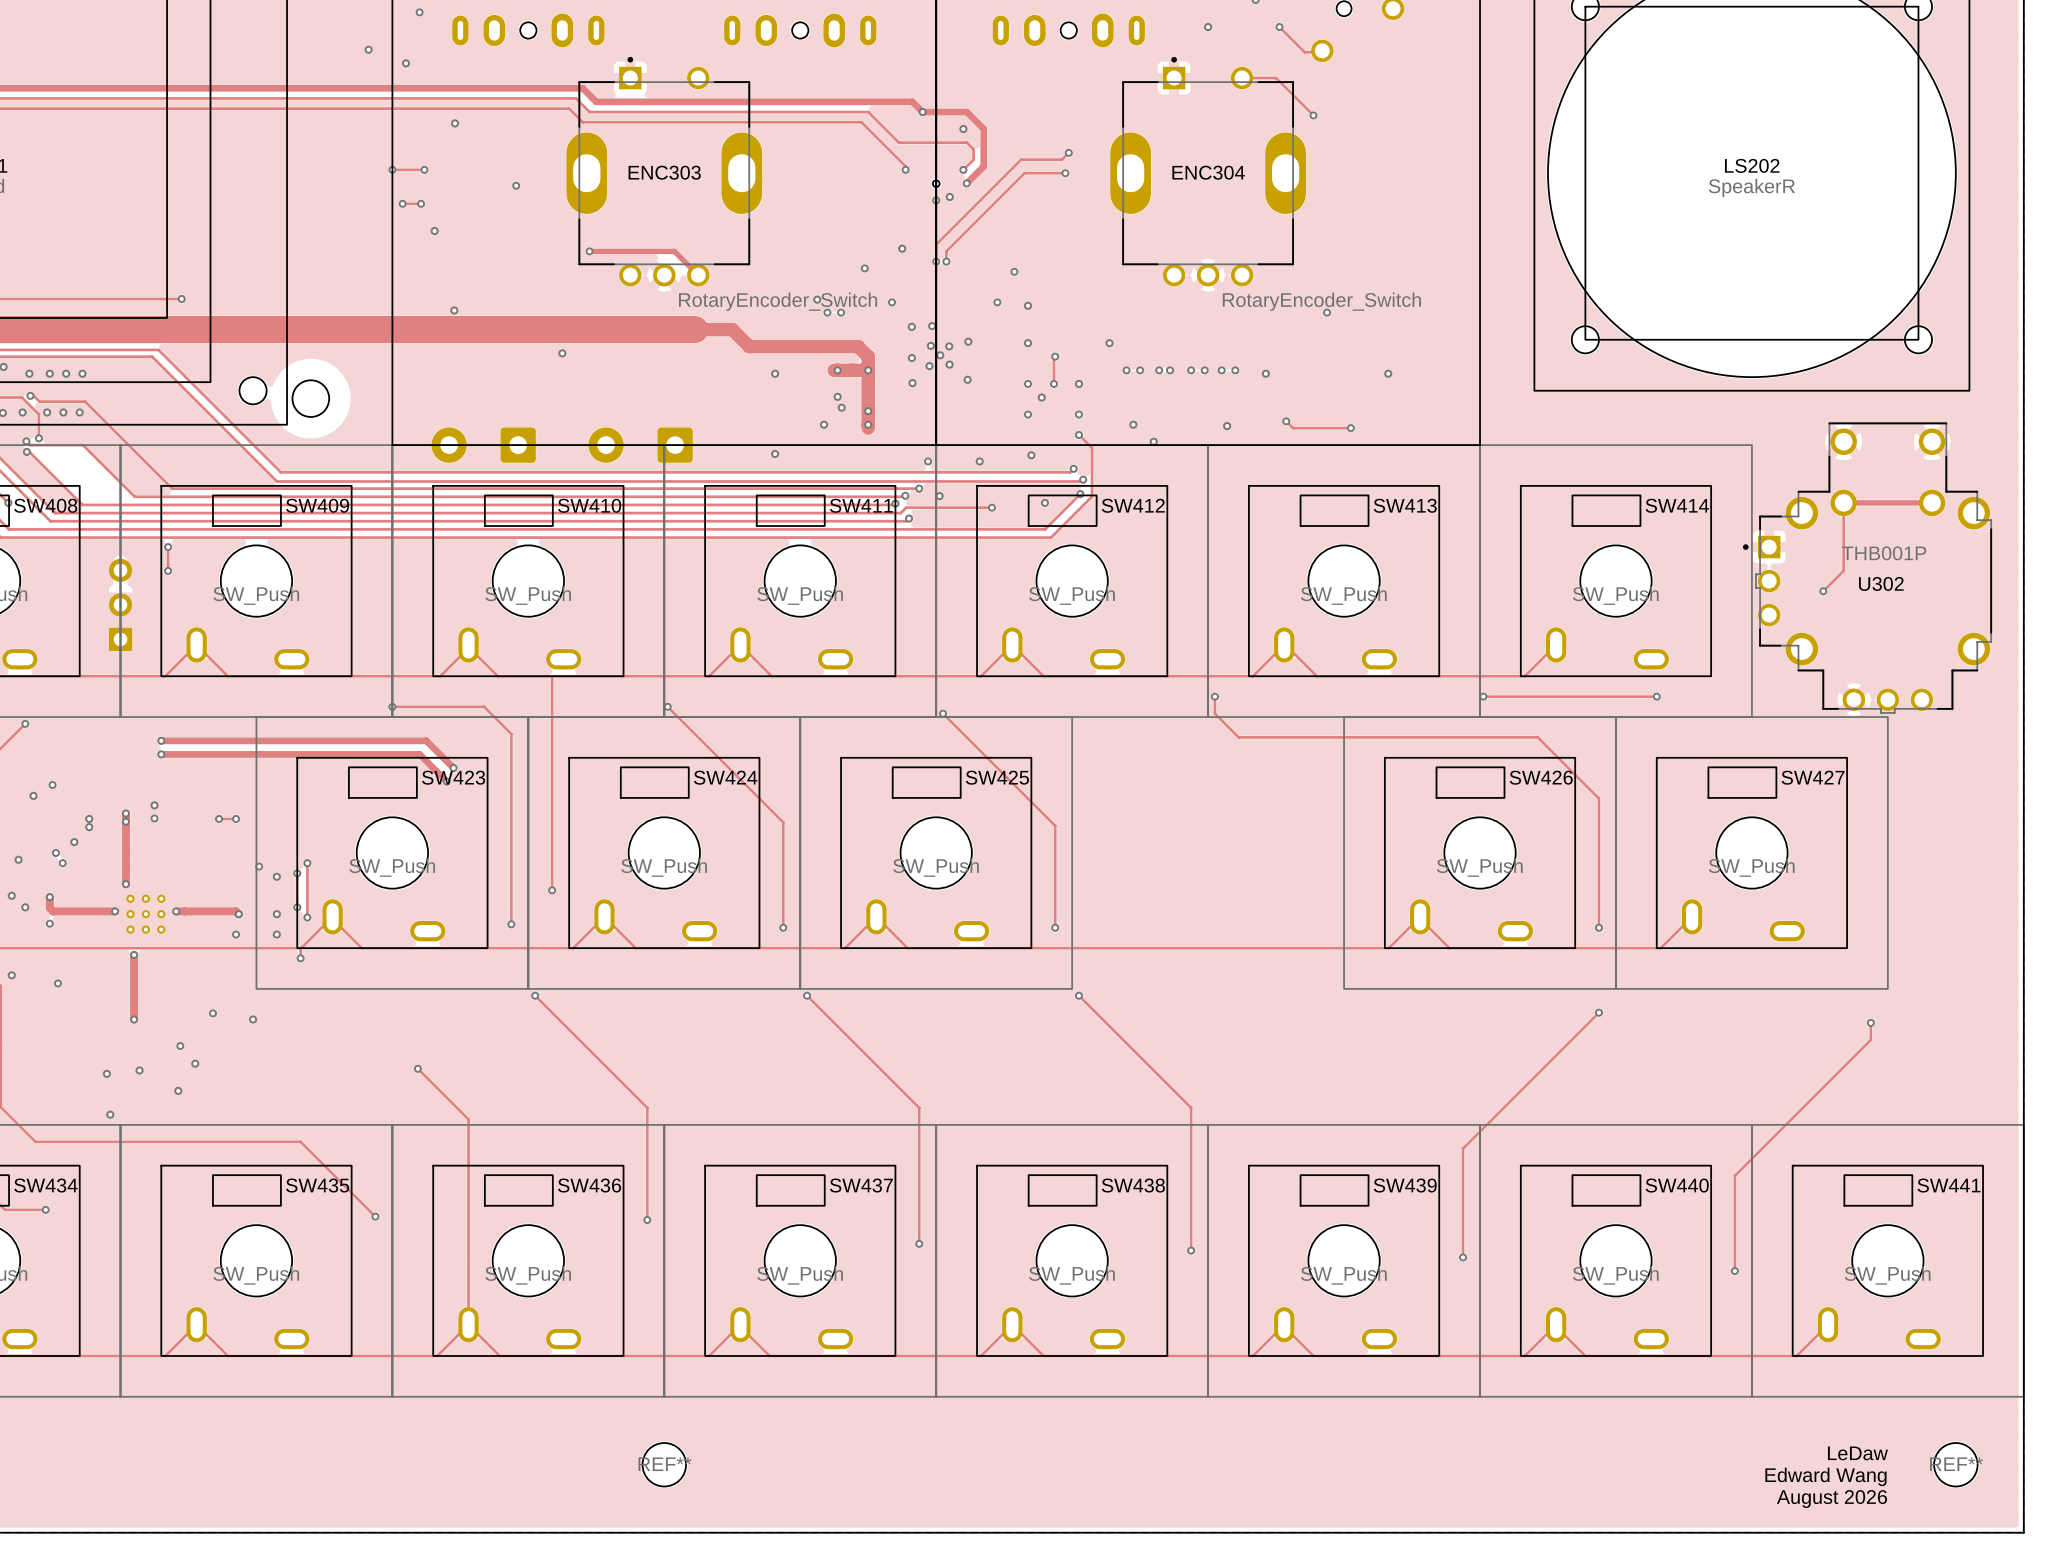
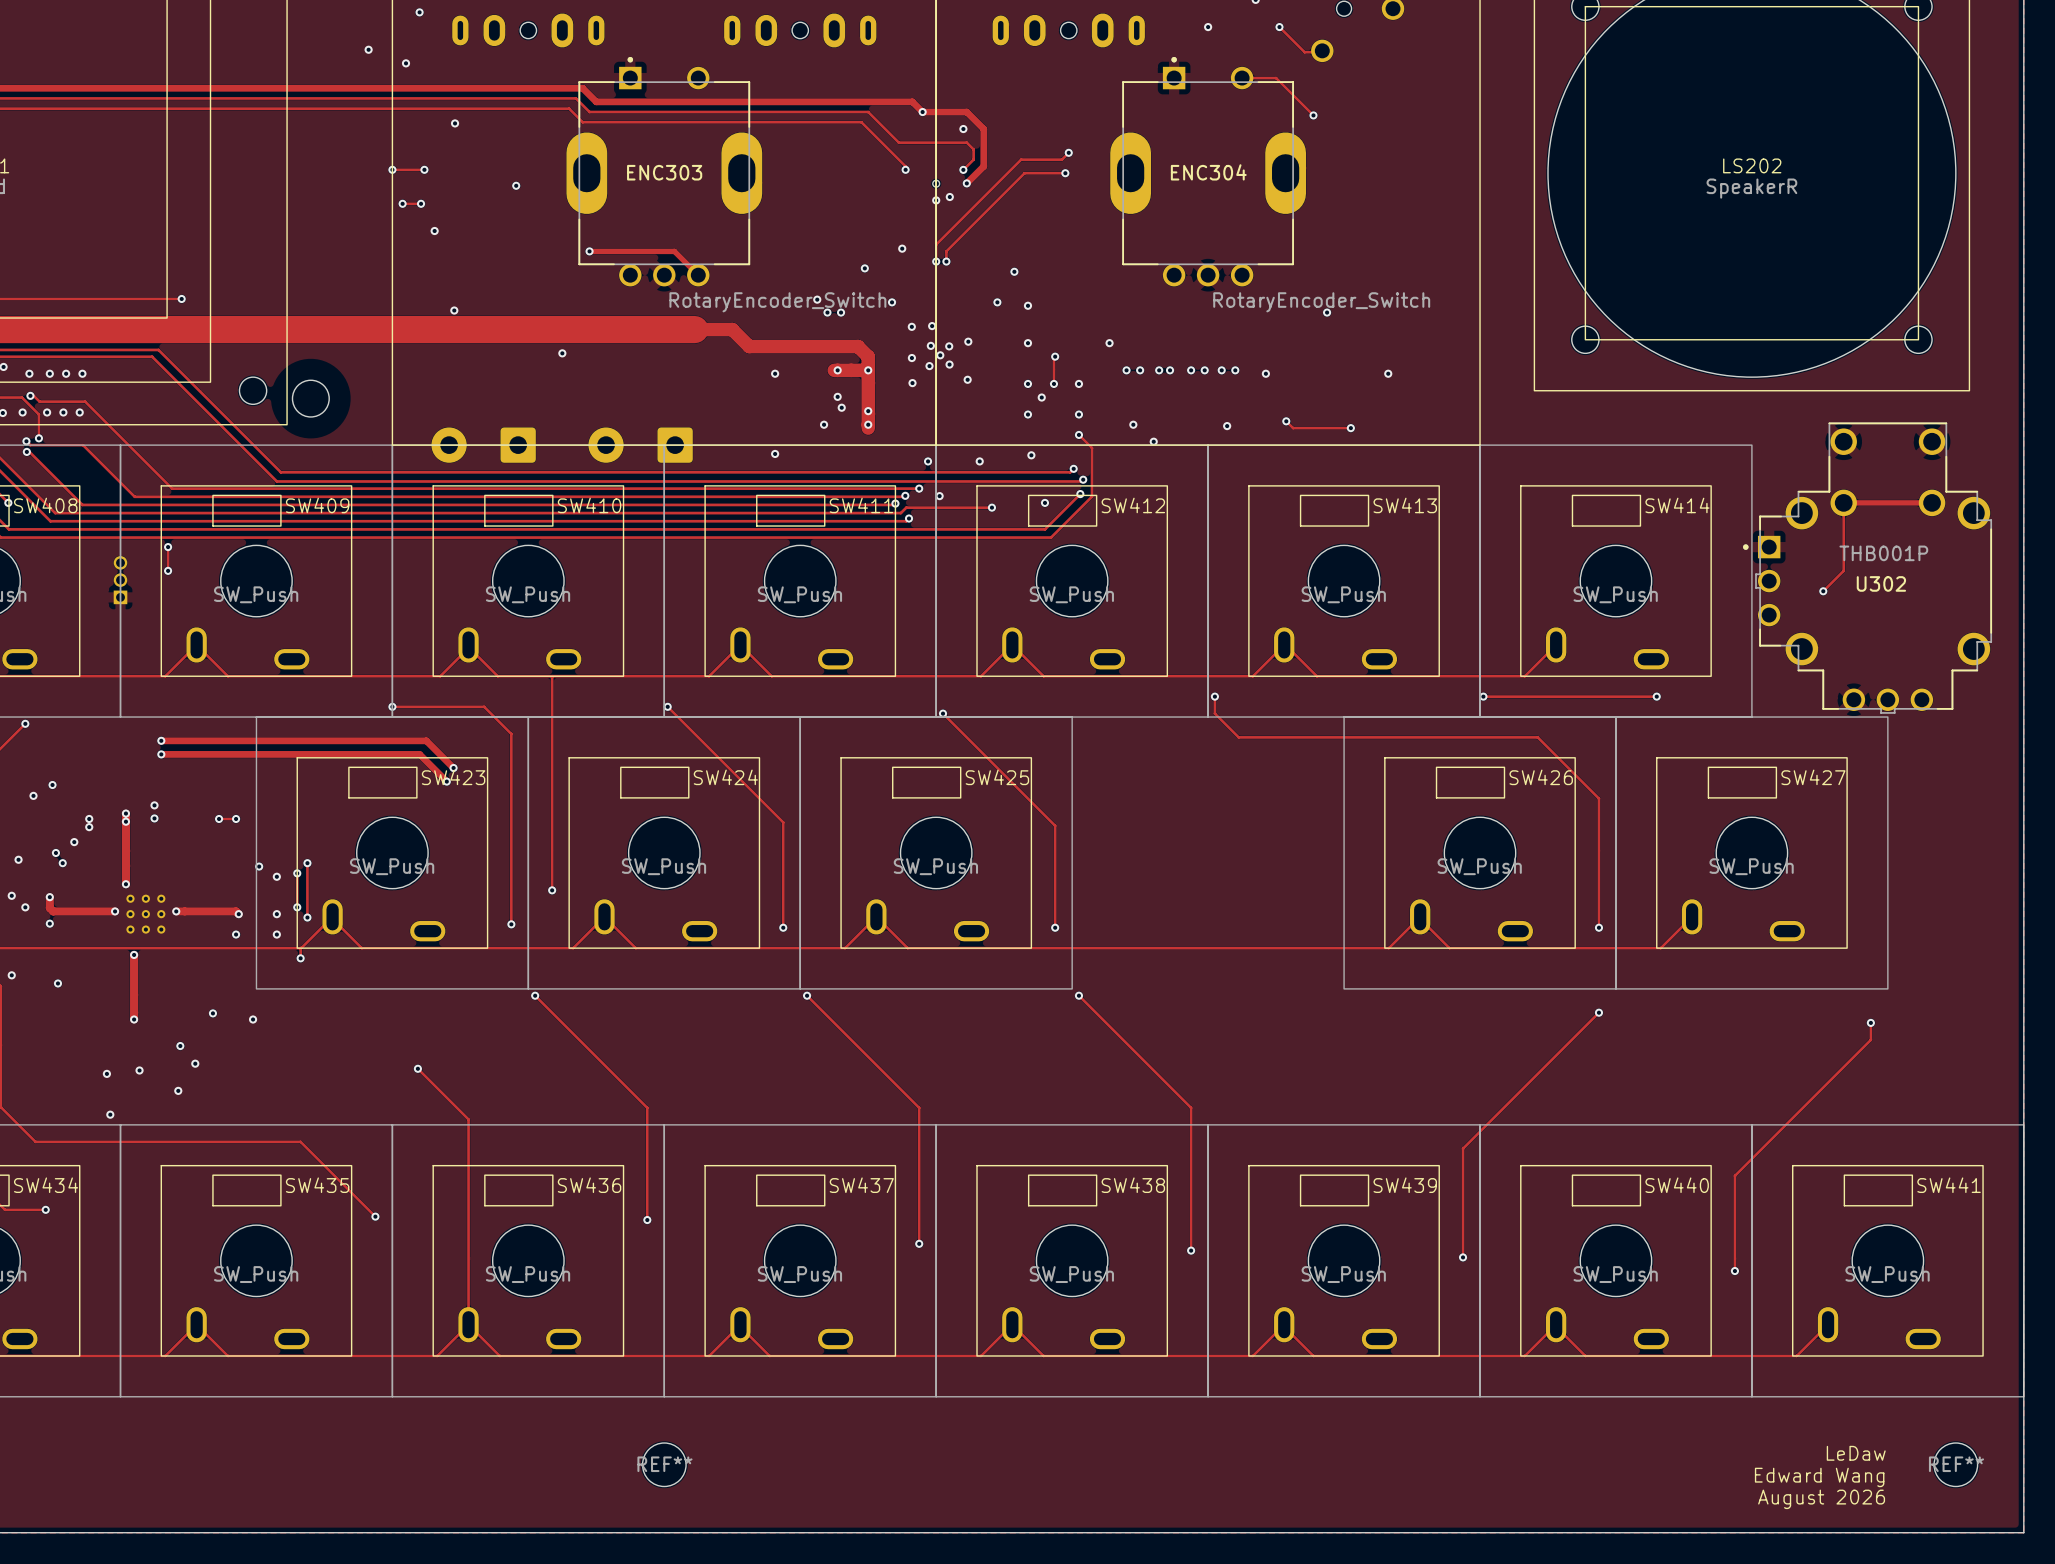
part: none -> (120, 580)
part: (120, 604) -> none

